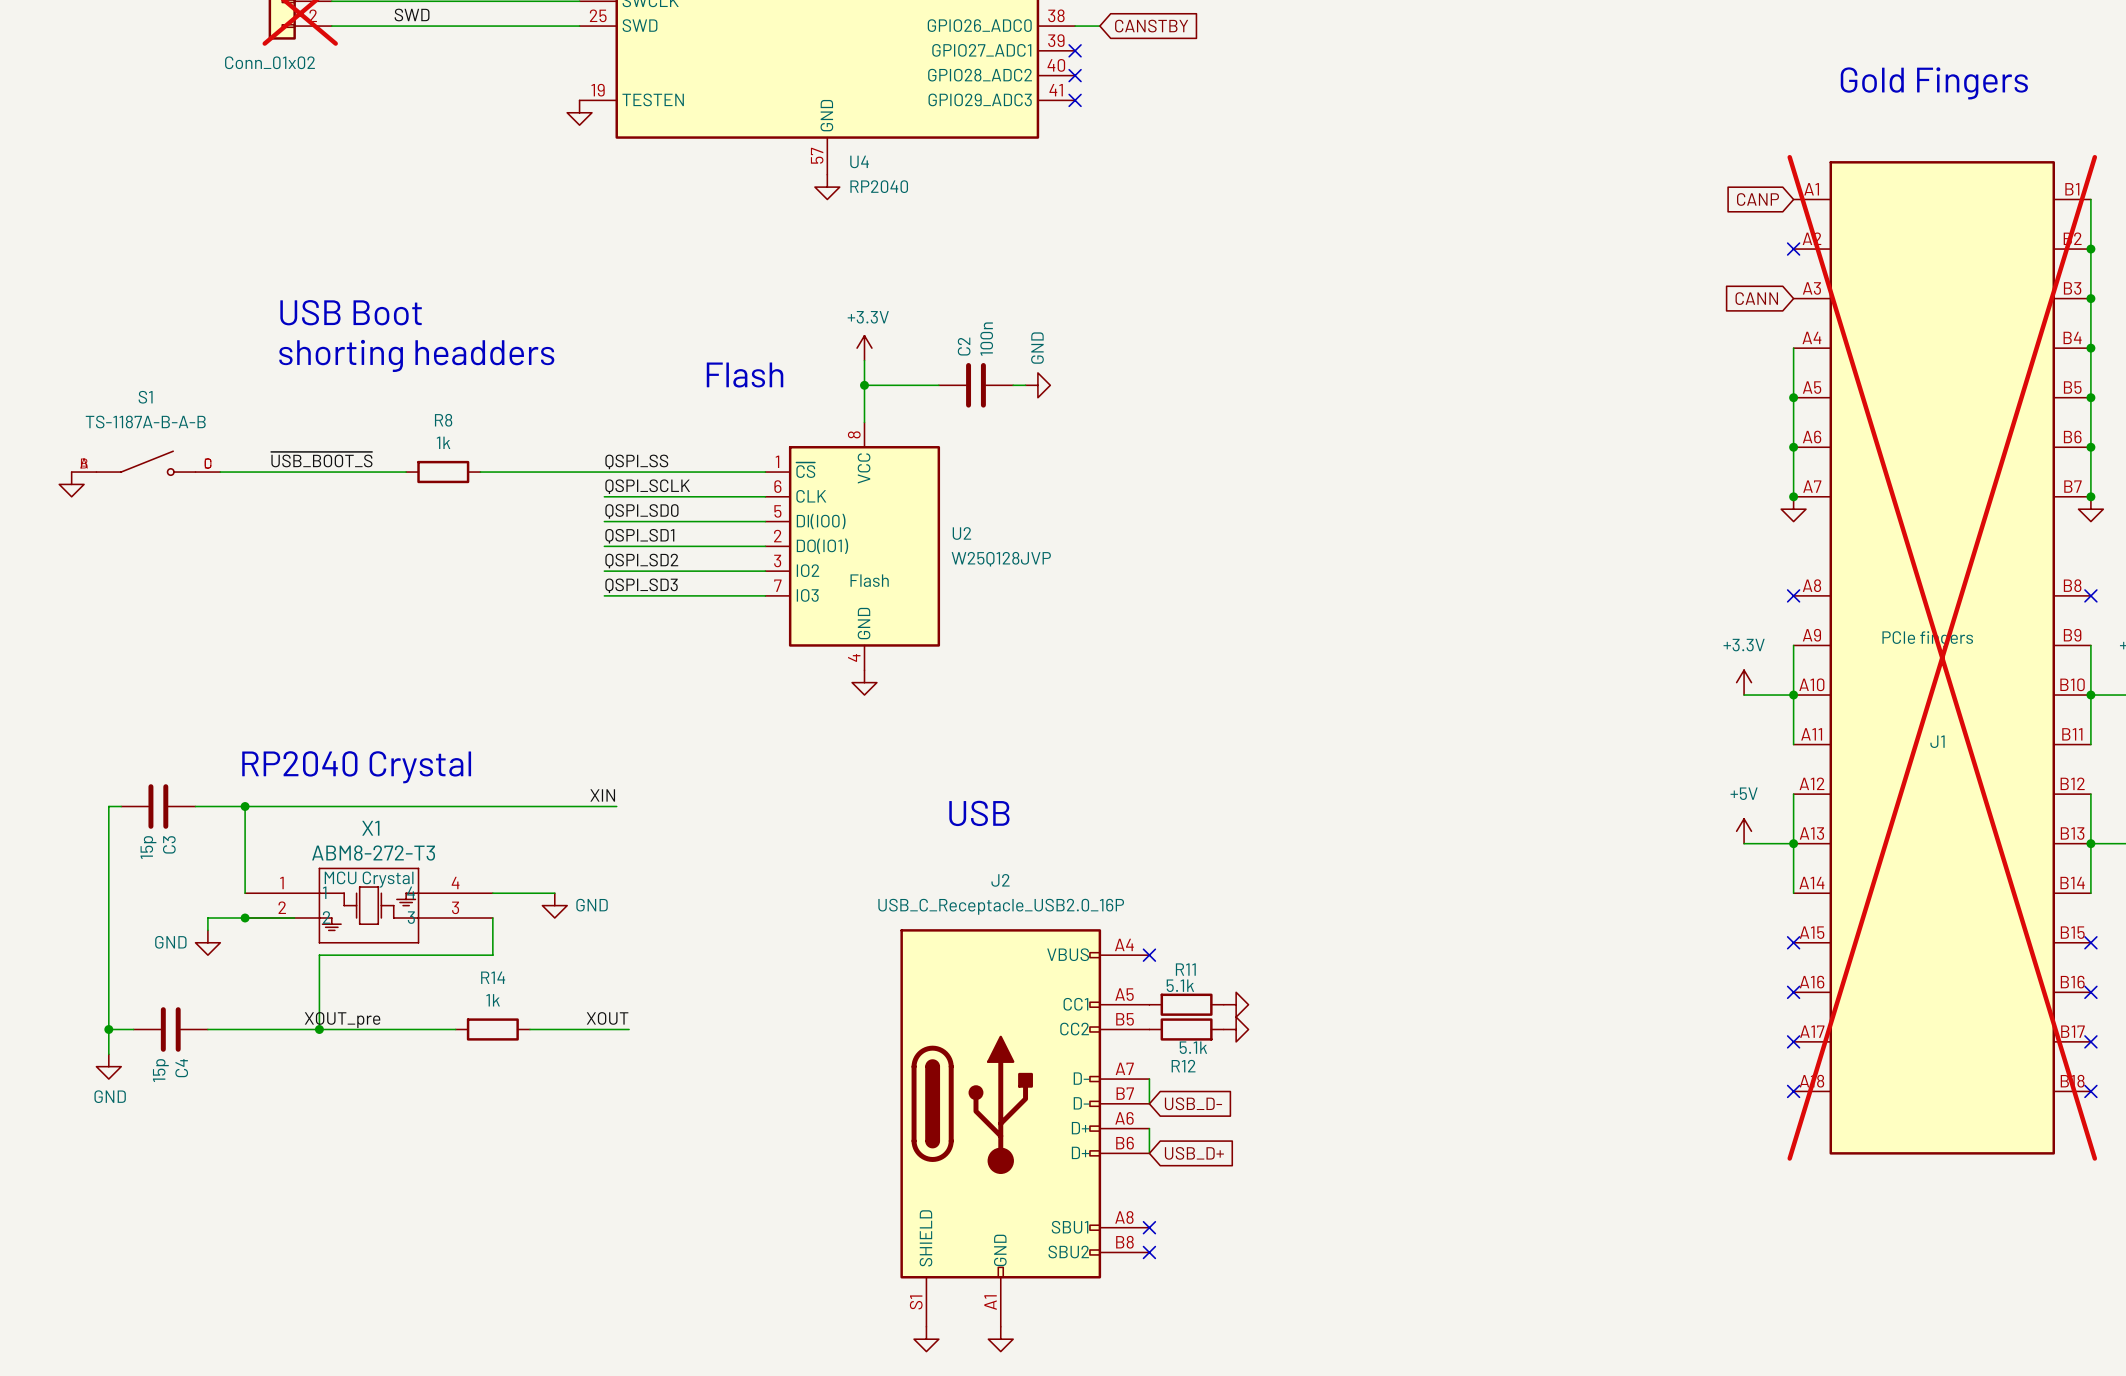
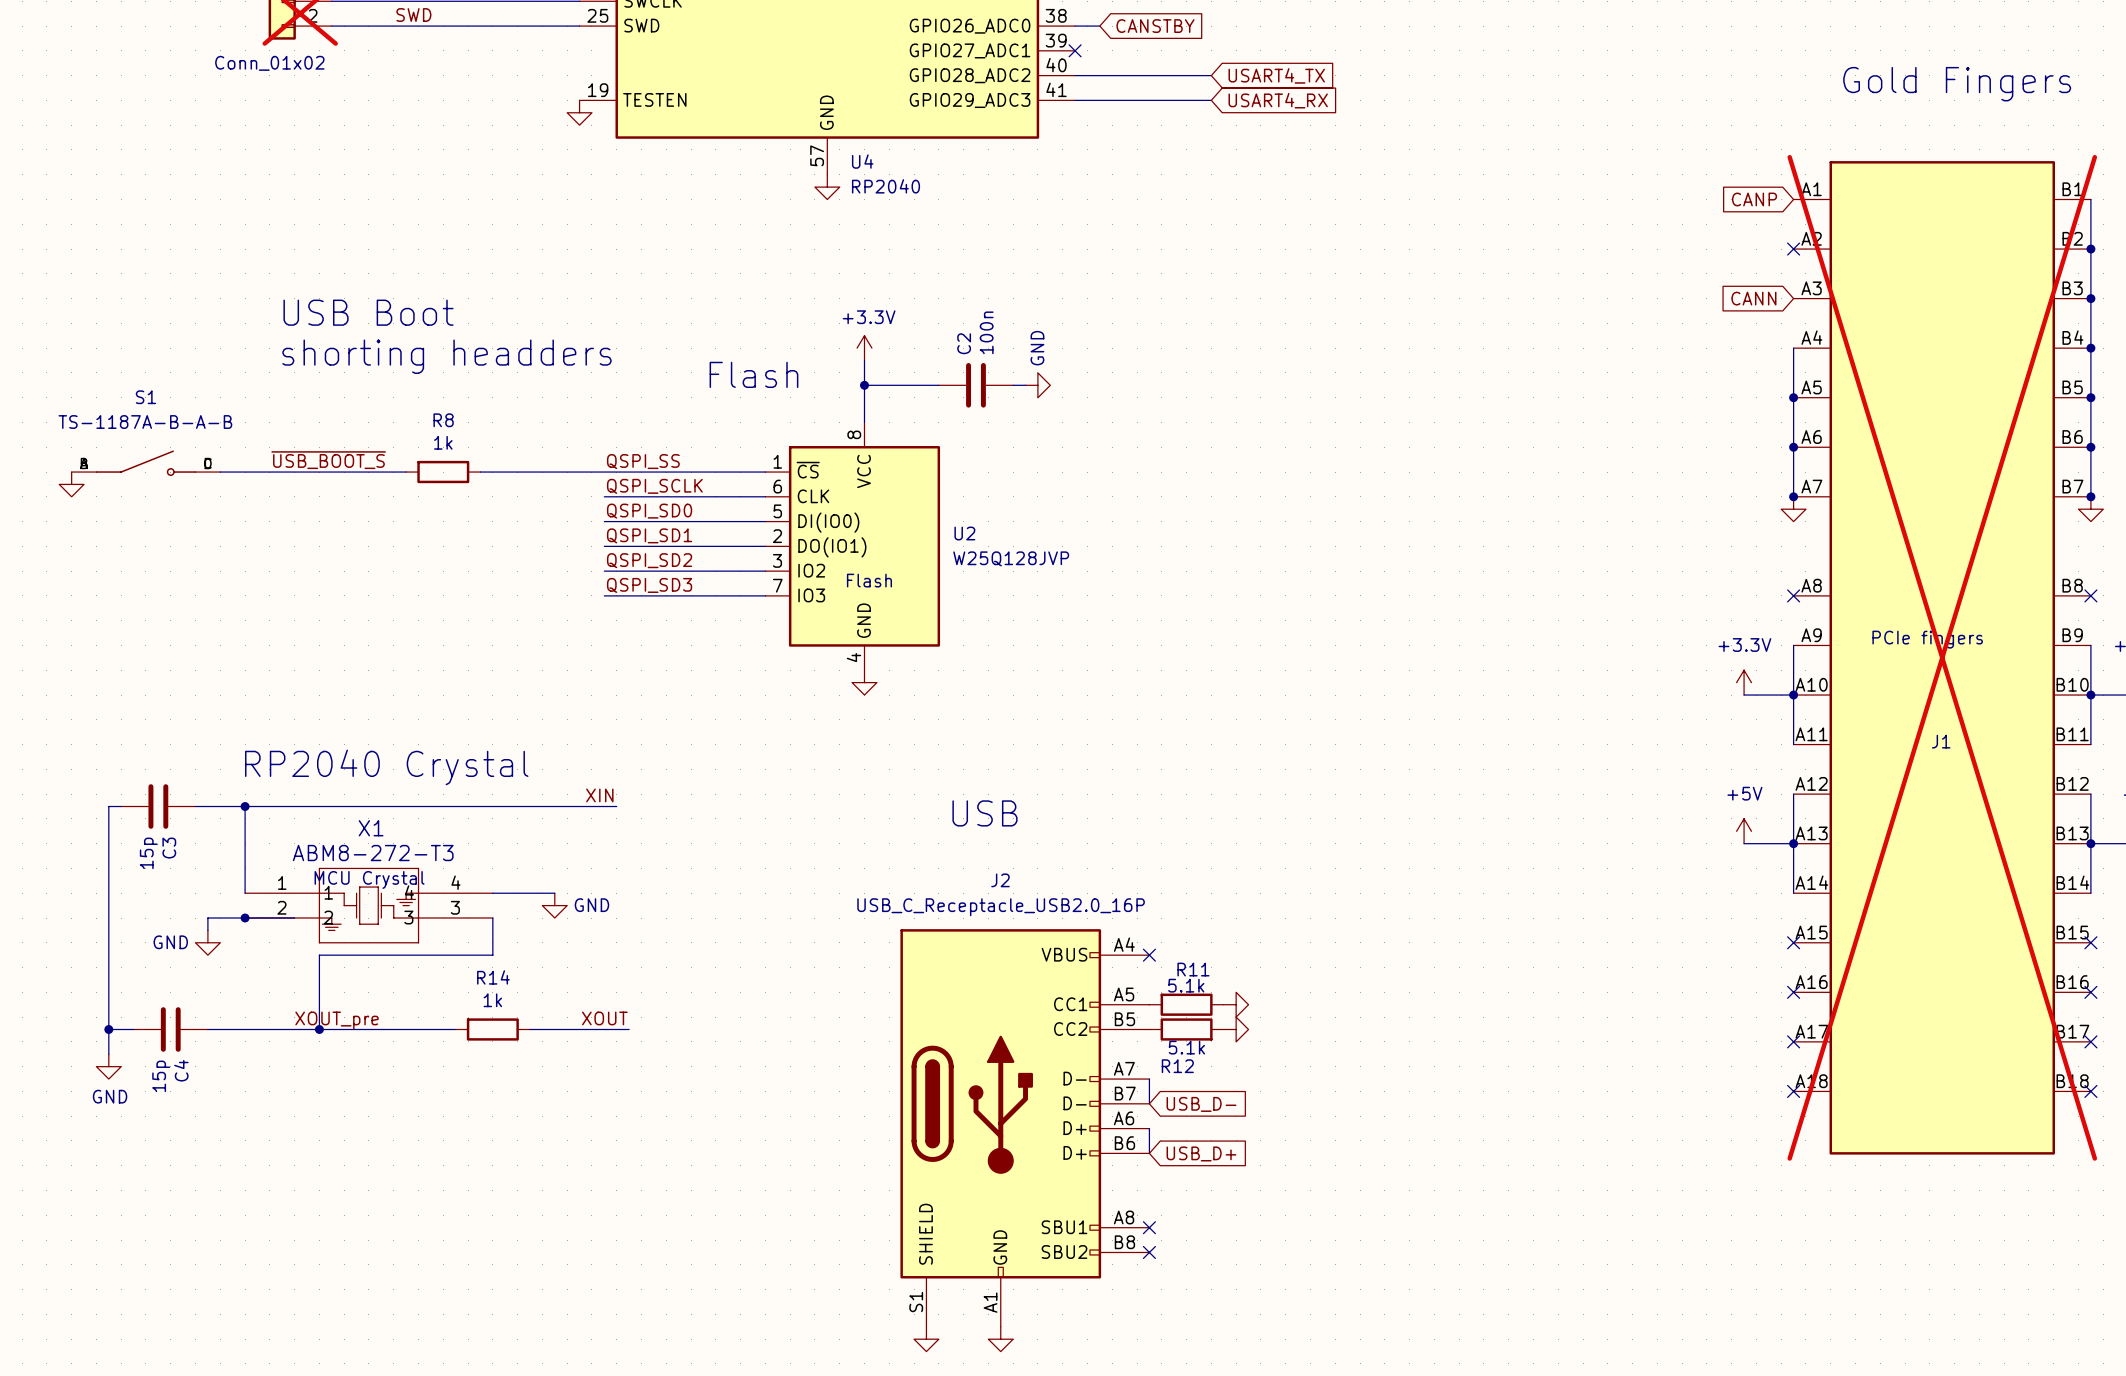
wire: none -> (1075, 75) (1211, 75)
no-connect mark: (1075, 75) -> none
global label: none -> USART4_TX (1276, 75)
wire: none -> (1075, 100) (1211, 100)
no-connect mark: (1075, 100) -> none
global label: none -> USART4_RX (1278, 100)

